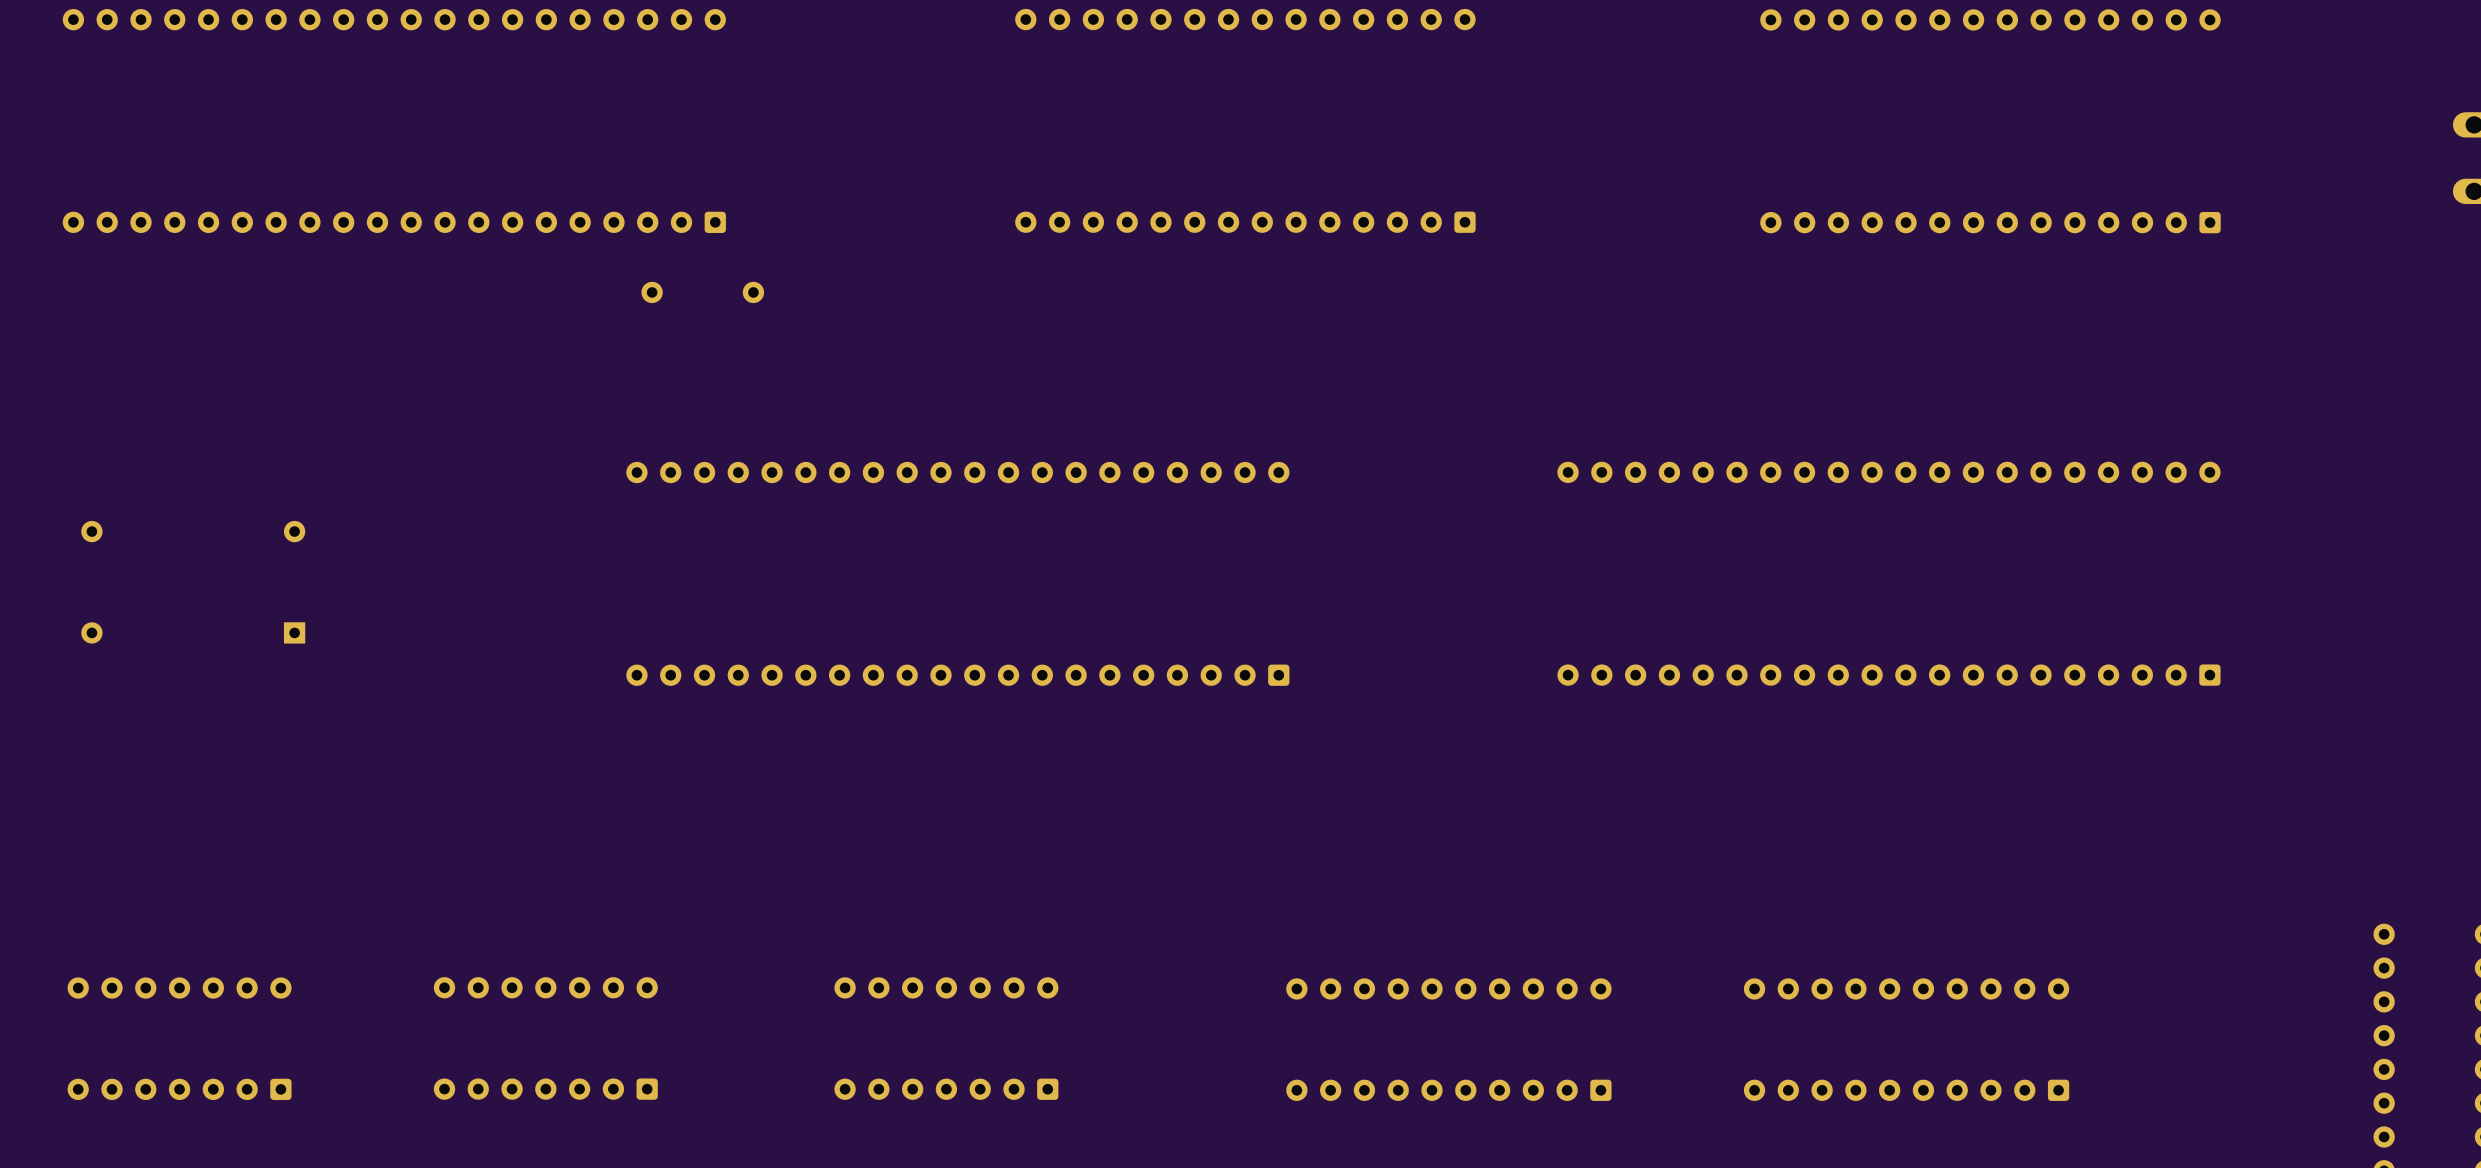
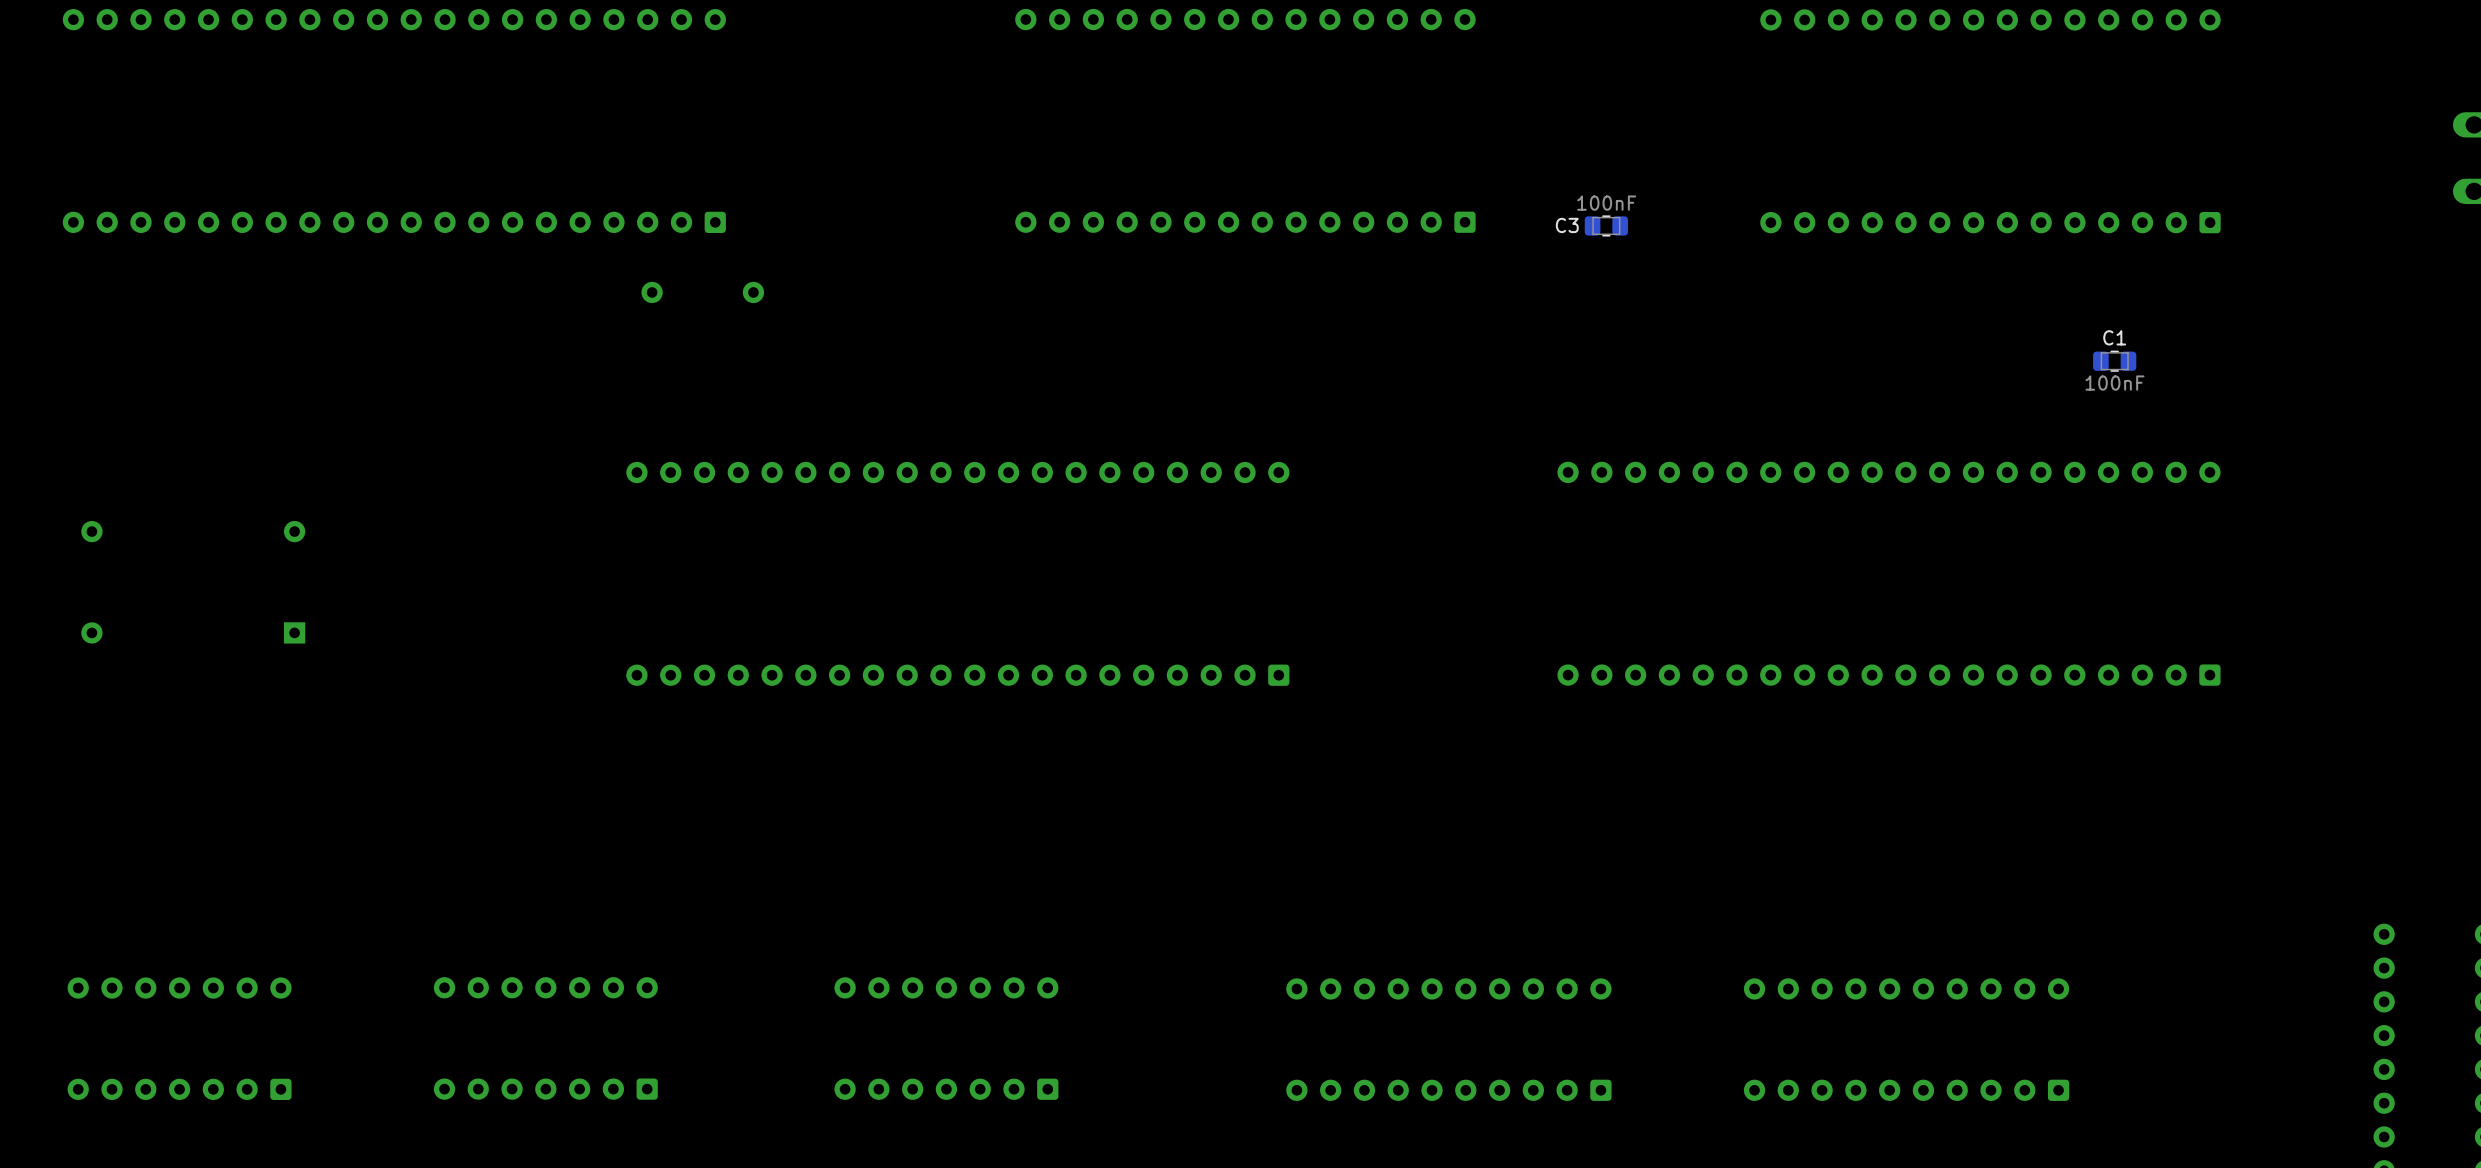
C3: none -> 100nF (1606, 225)
C1: none -> 100nF (2114, 361)

